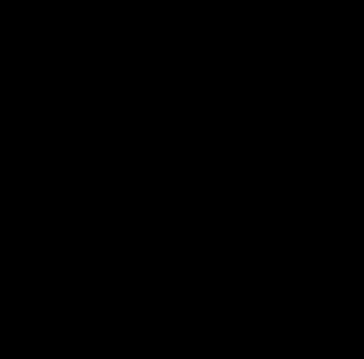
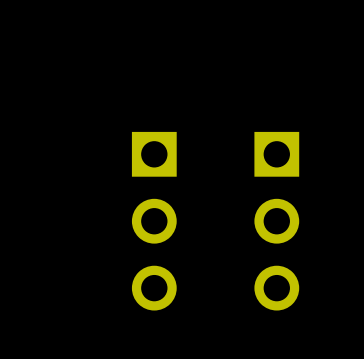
part: none -> (154, 221)
part: none -> (276, 221)

